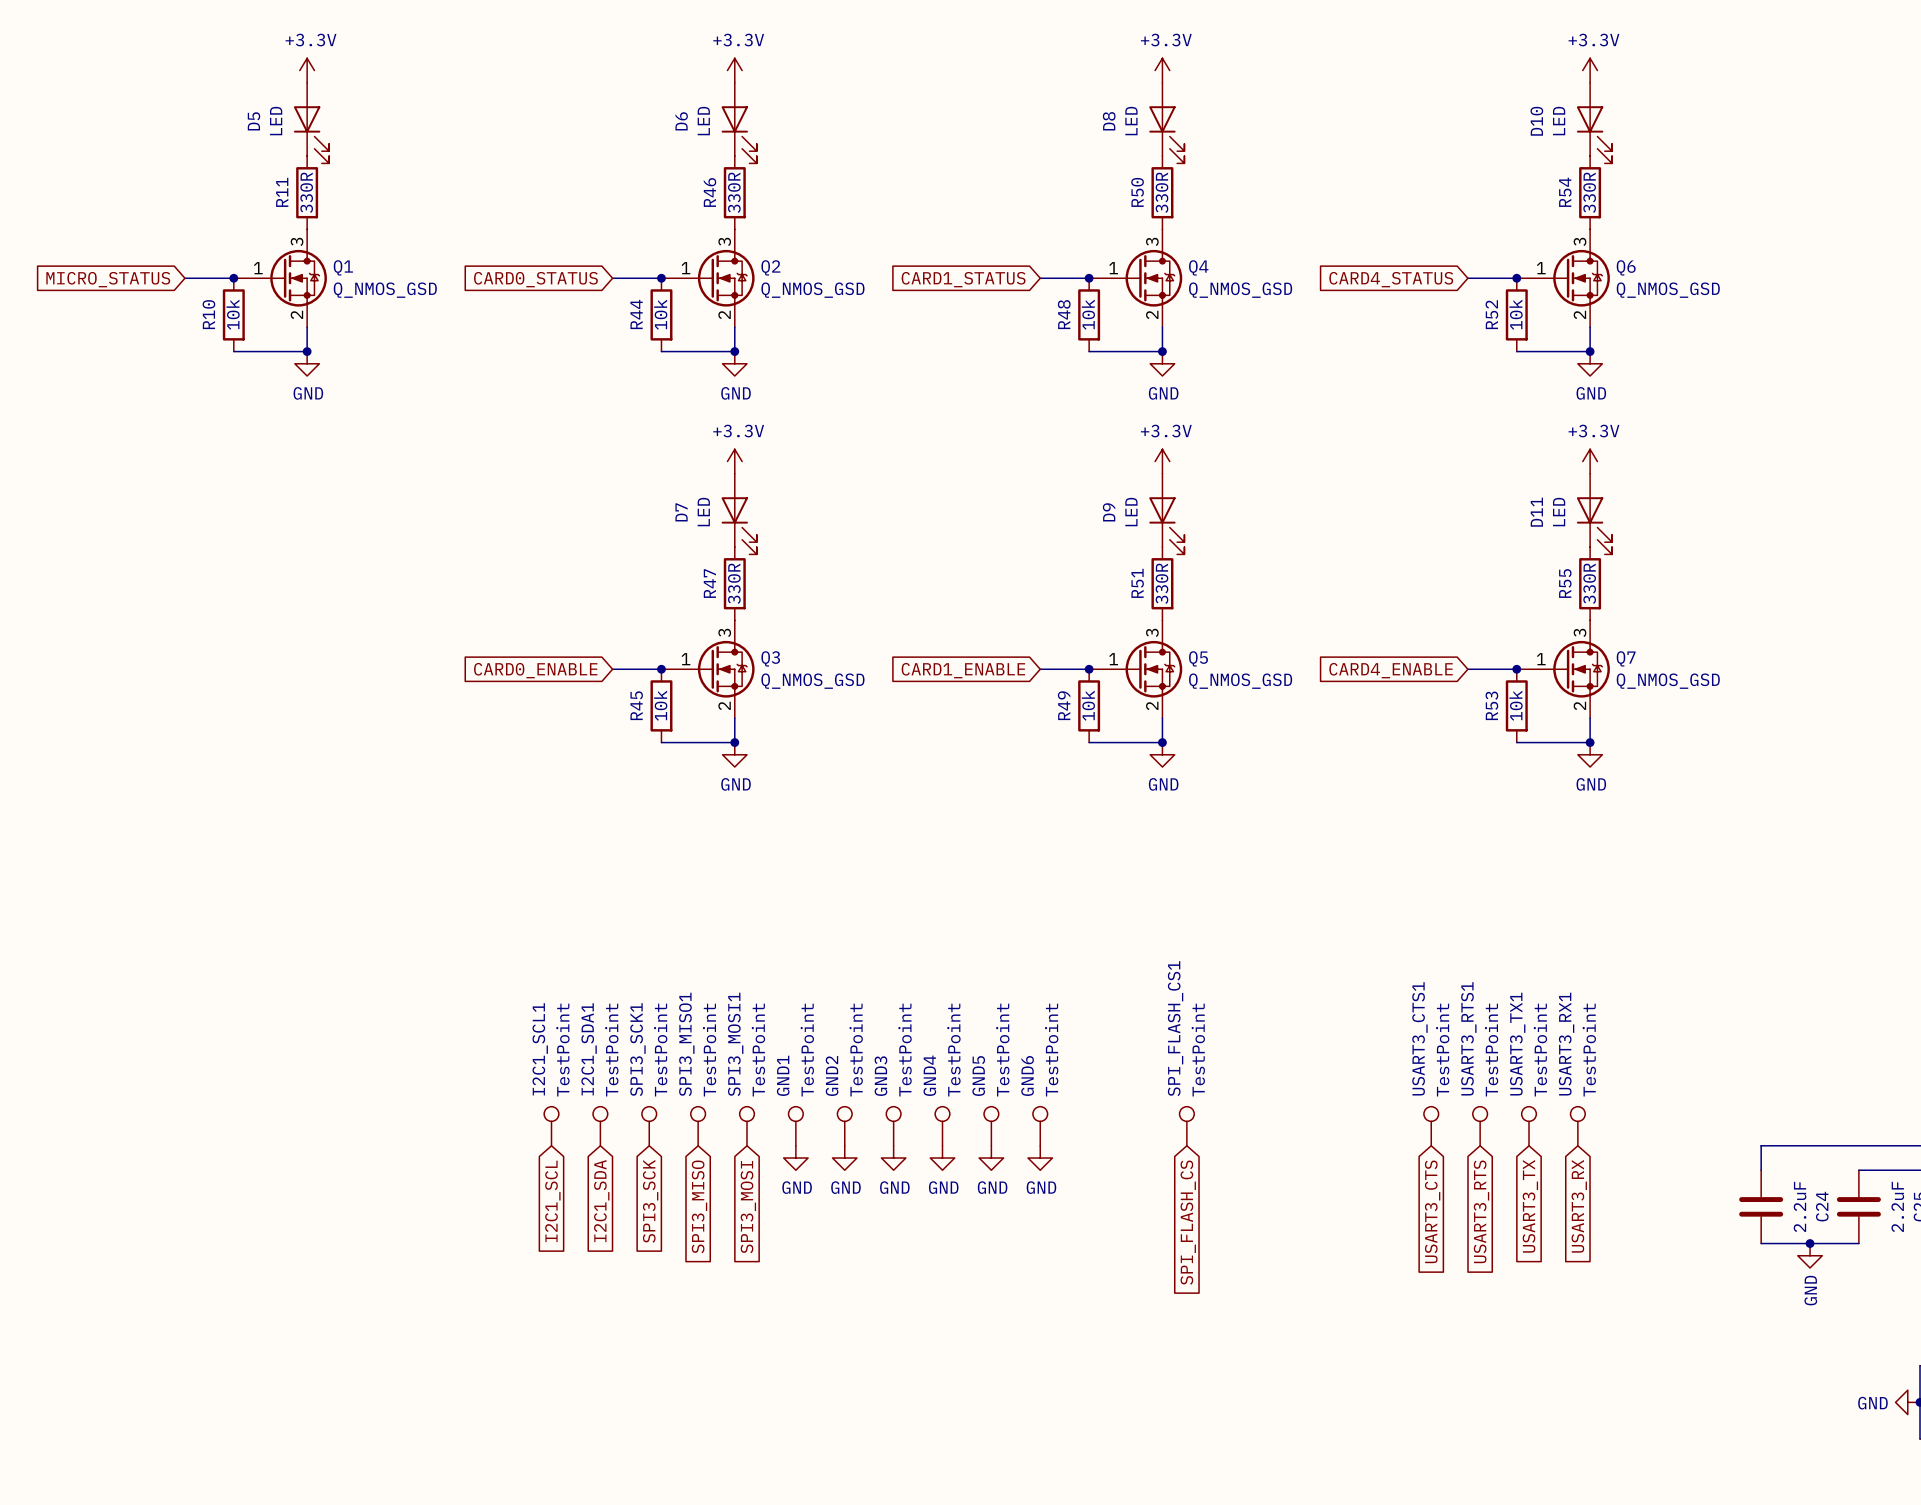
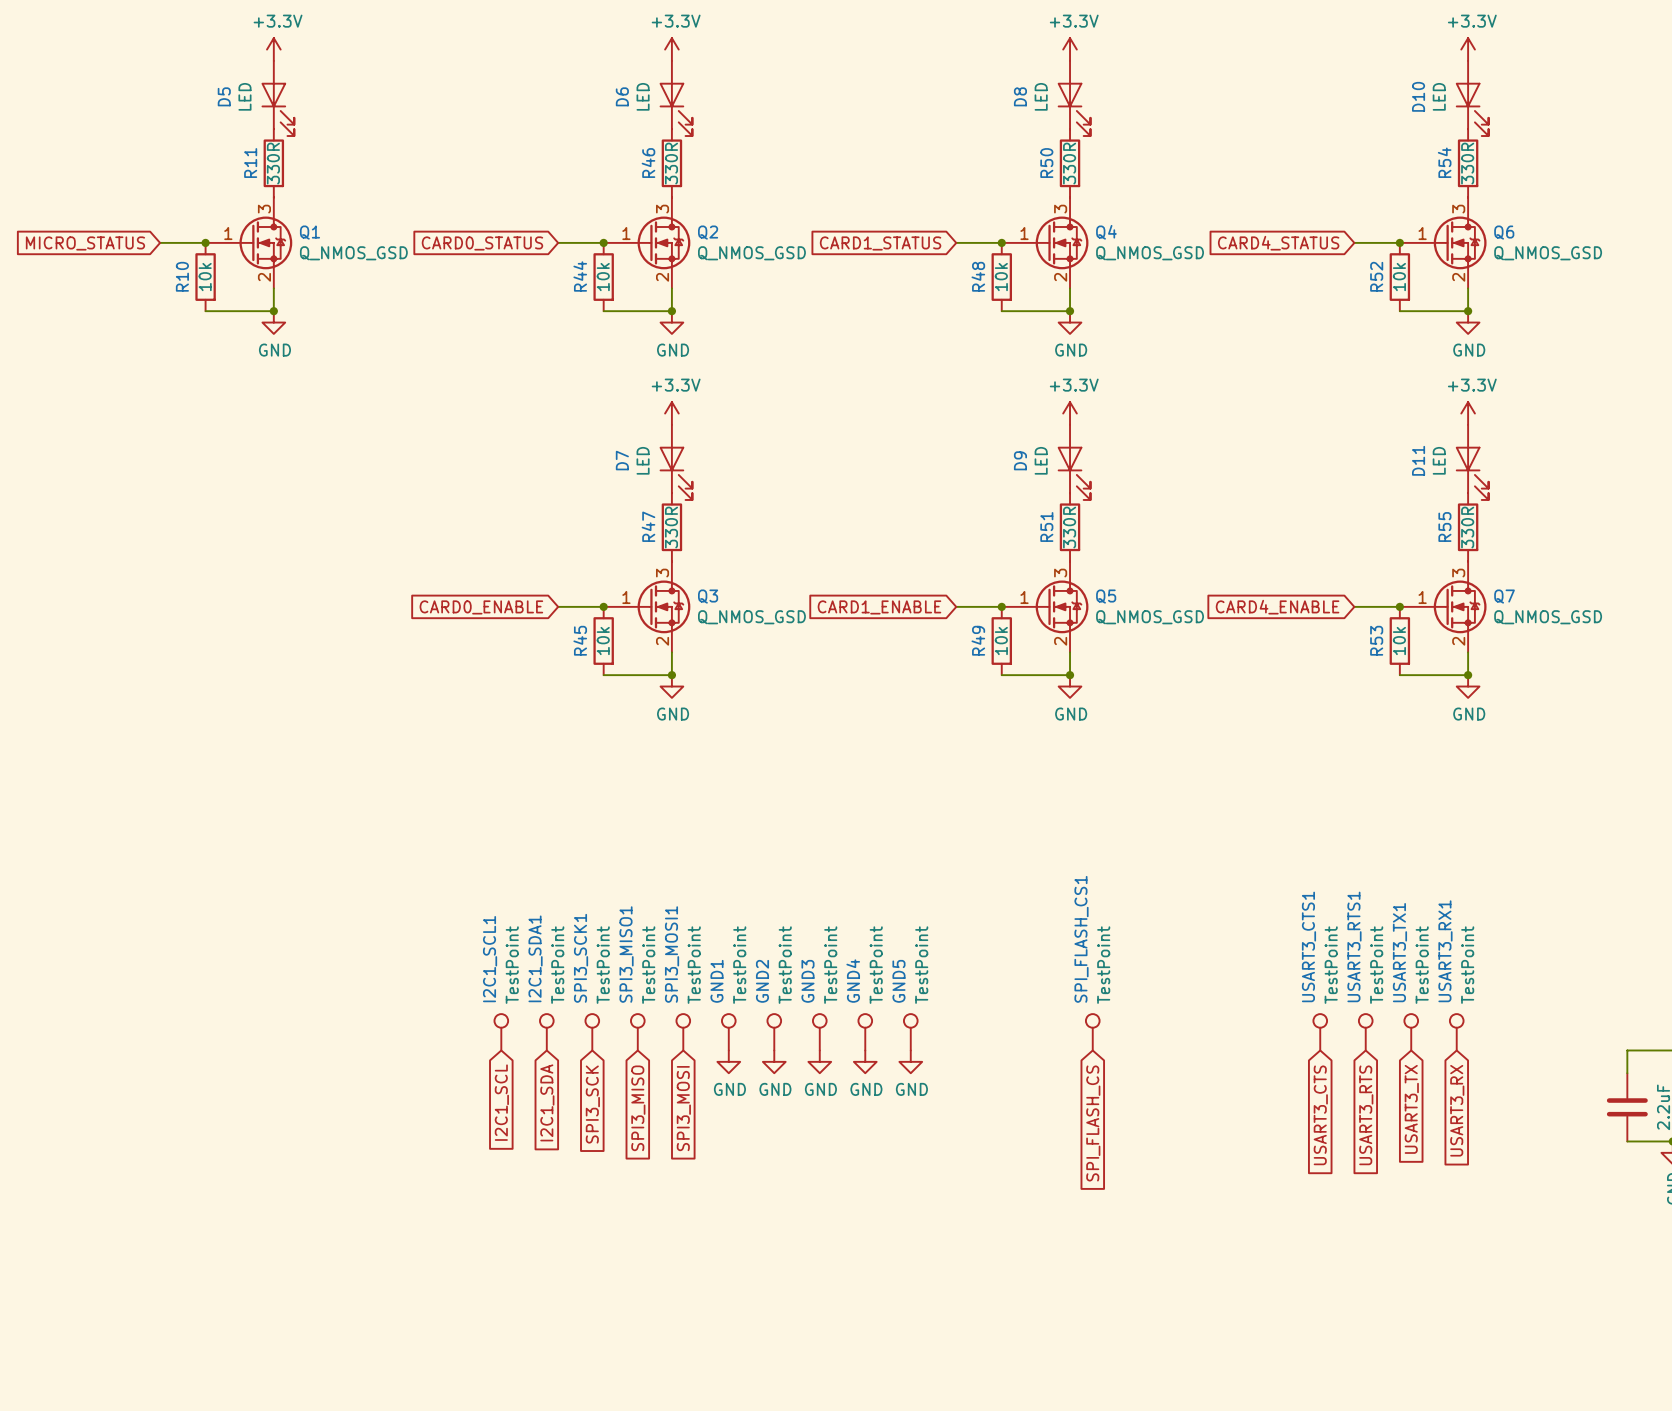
GND6: TestPoint (1040, 1126) -> none
power symbol: GND (1040, 1158) -> none

